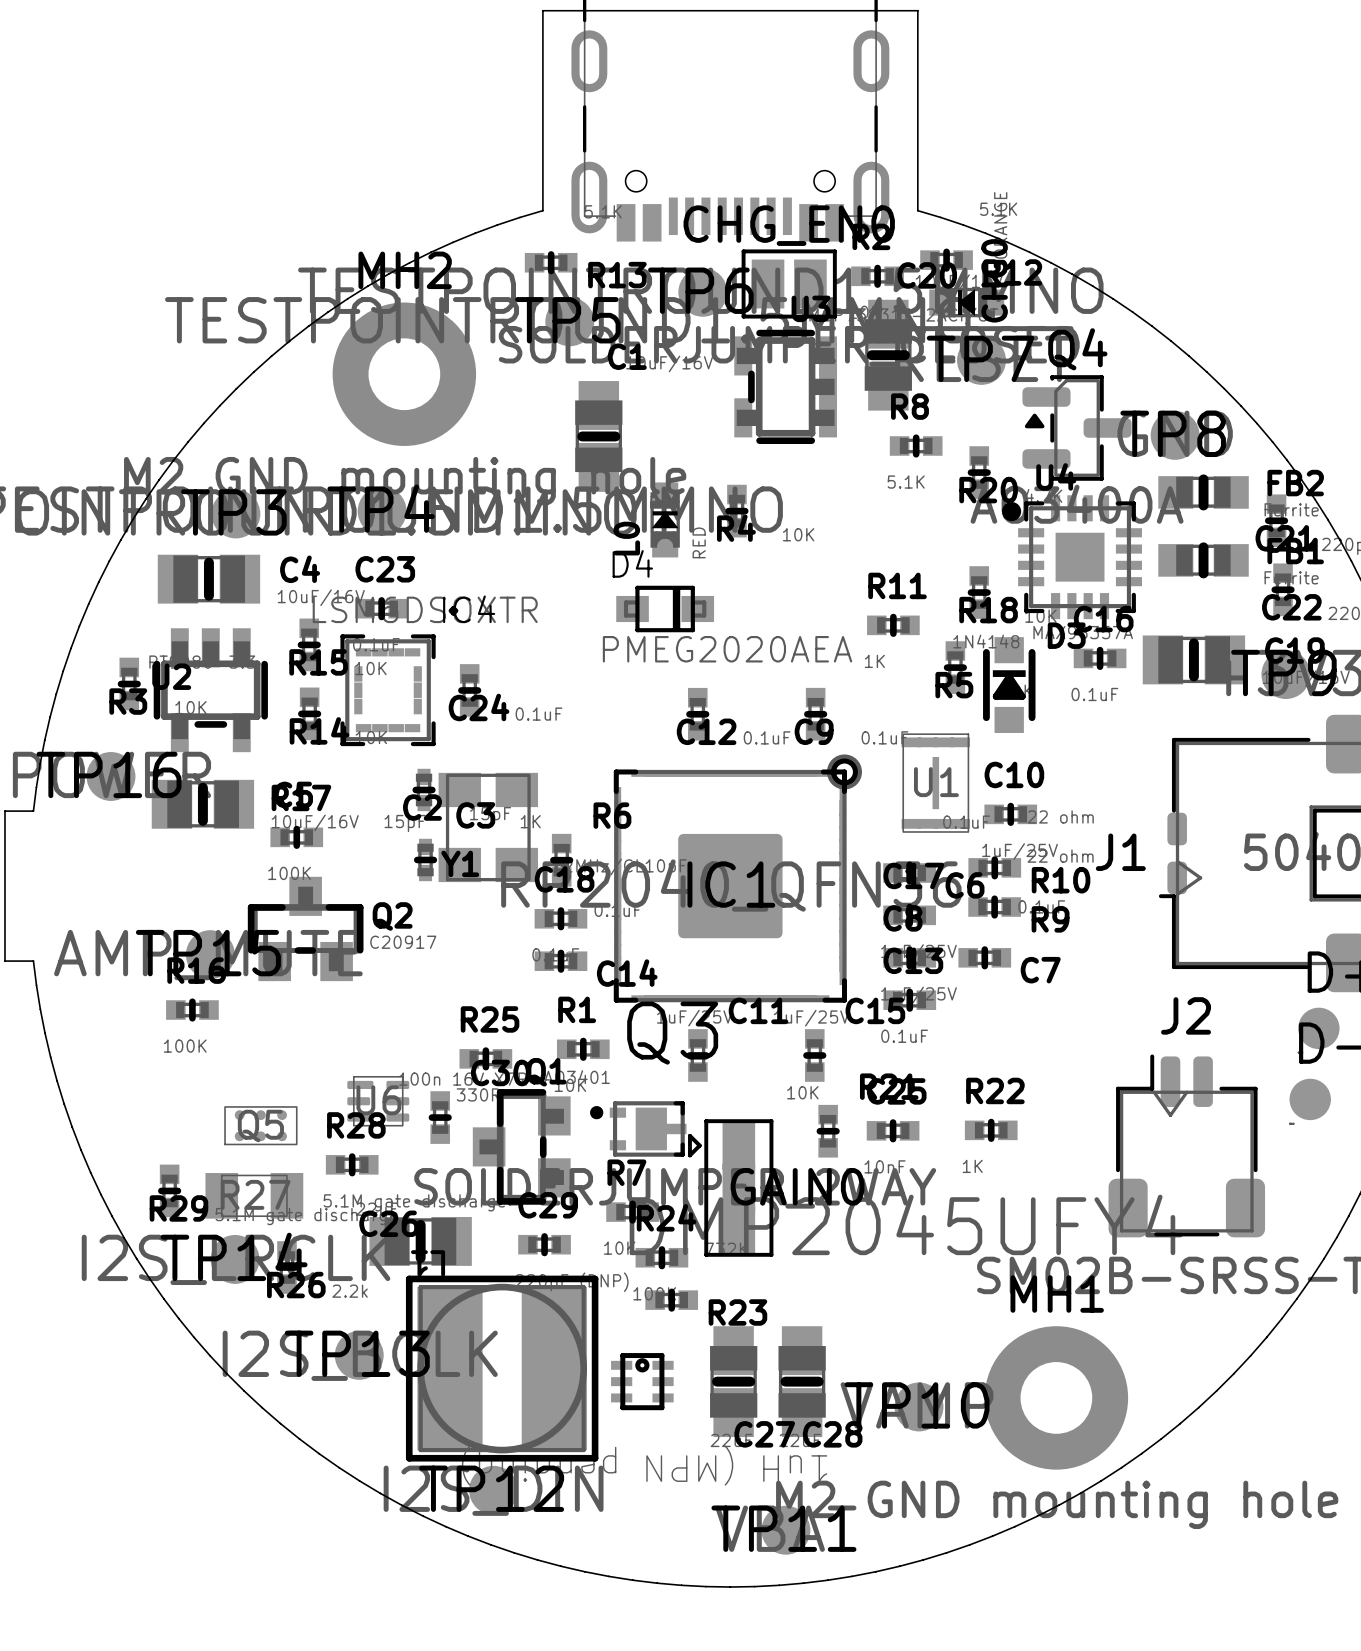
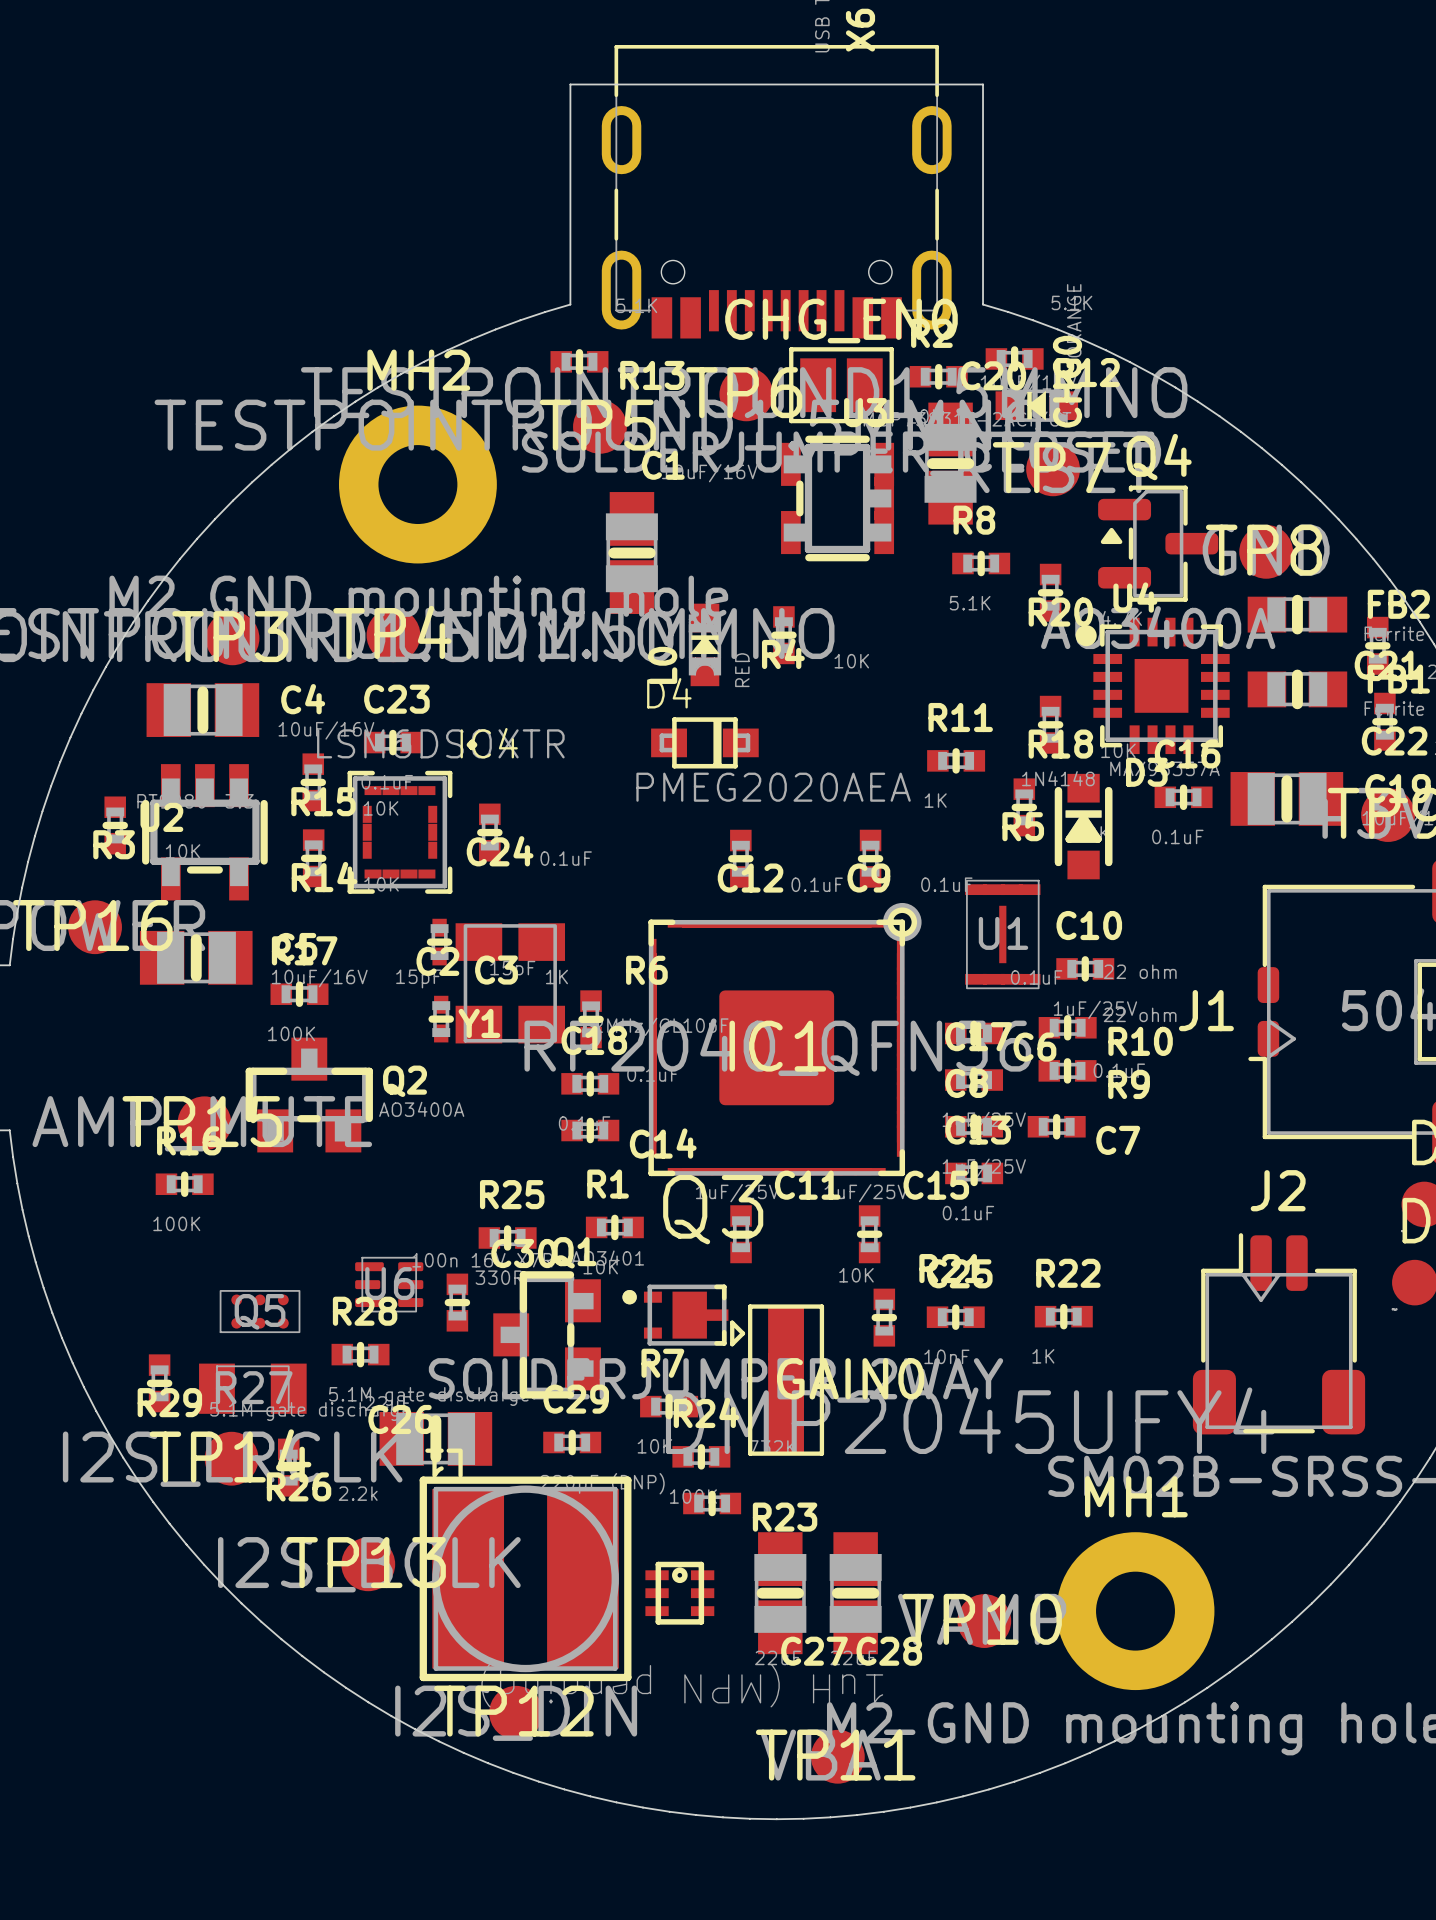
Q2 value: C20917 (403, 942) -> AO3400A (421, 1109)

